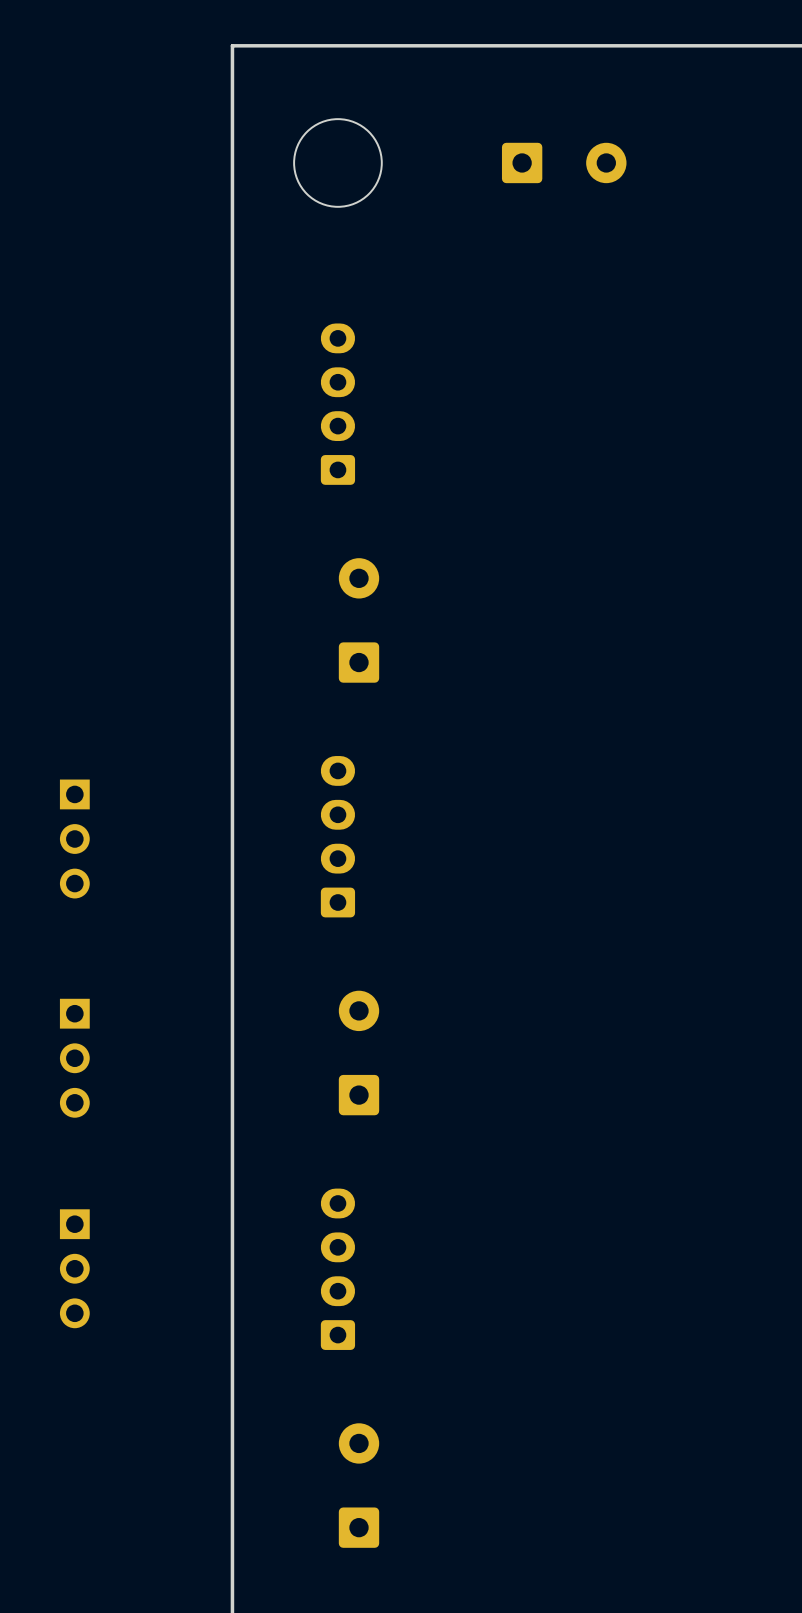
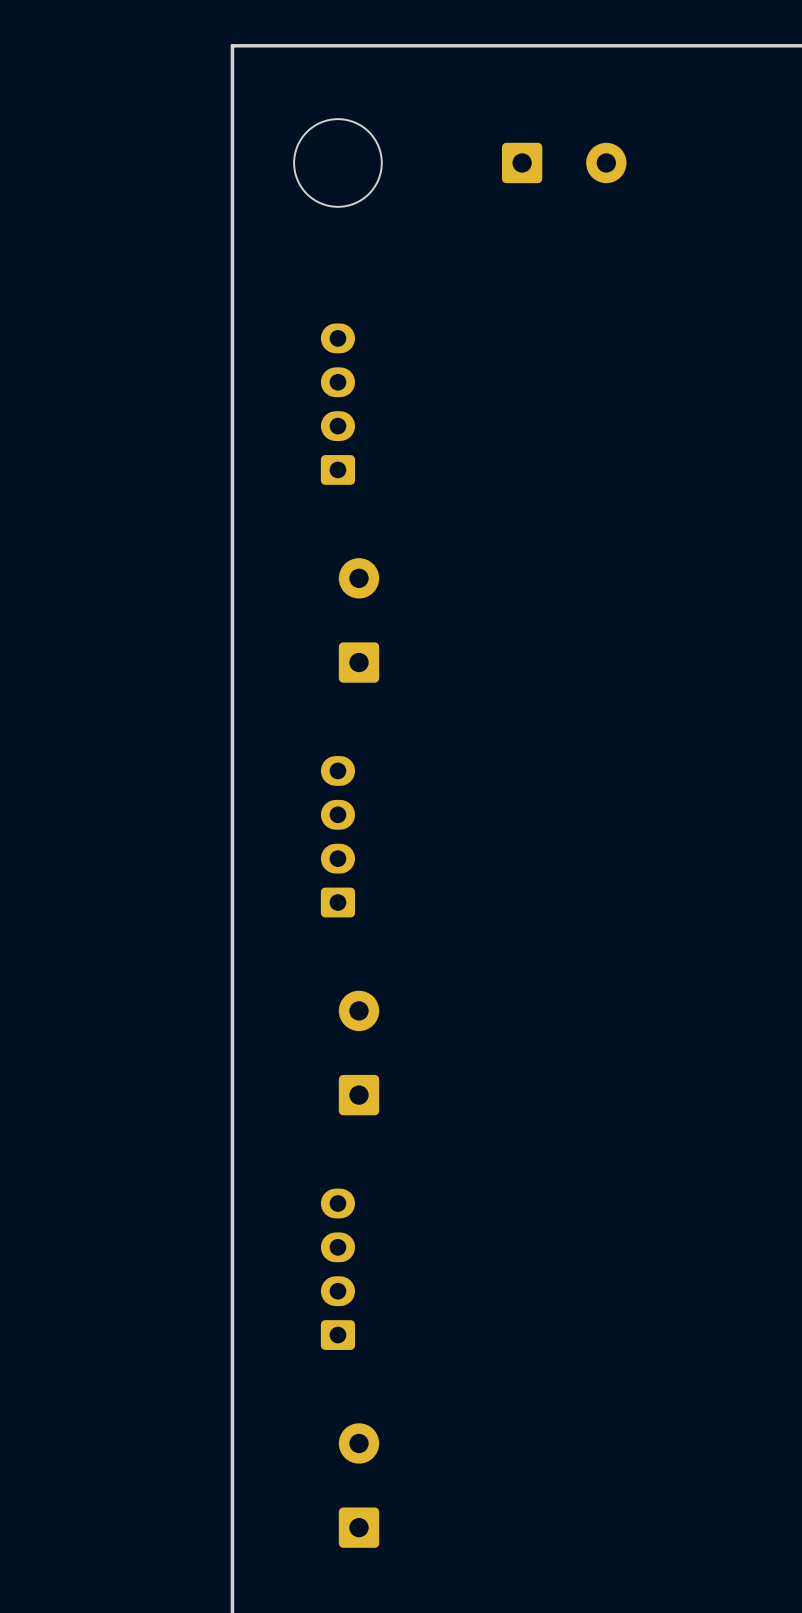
part: (74, 839) -> none
part: (74, 1058) -> none
part: (74, 1268) -> none

